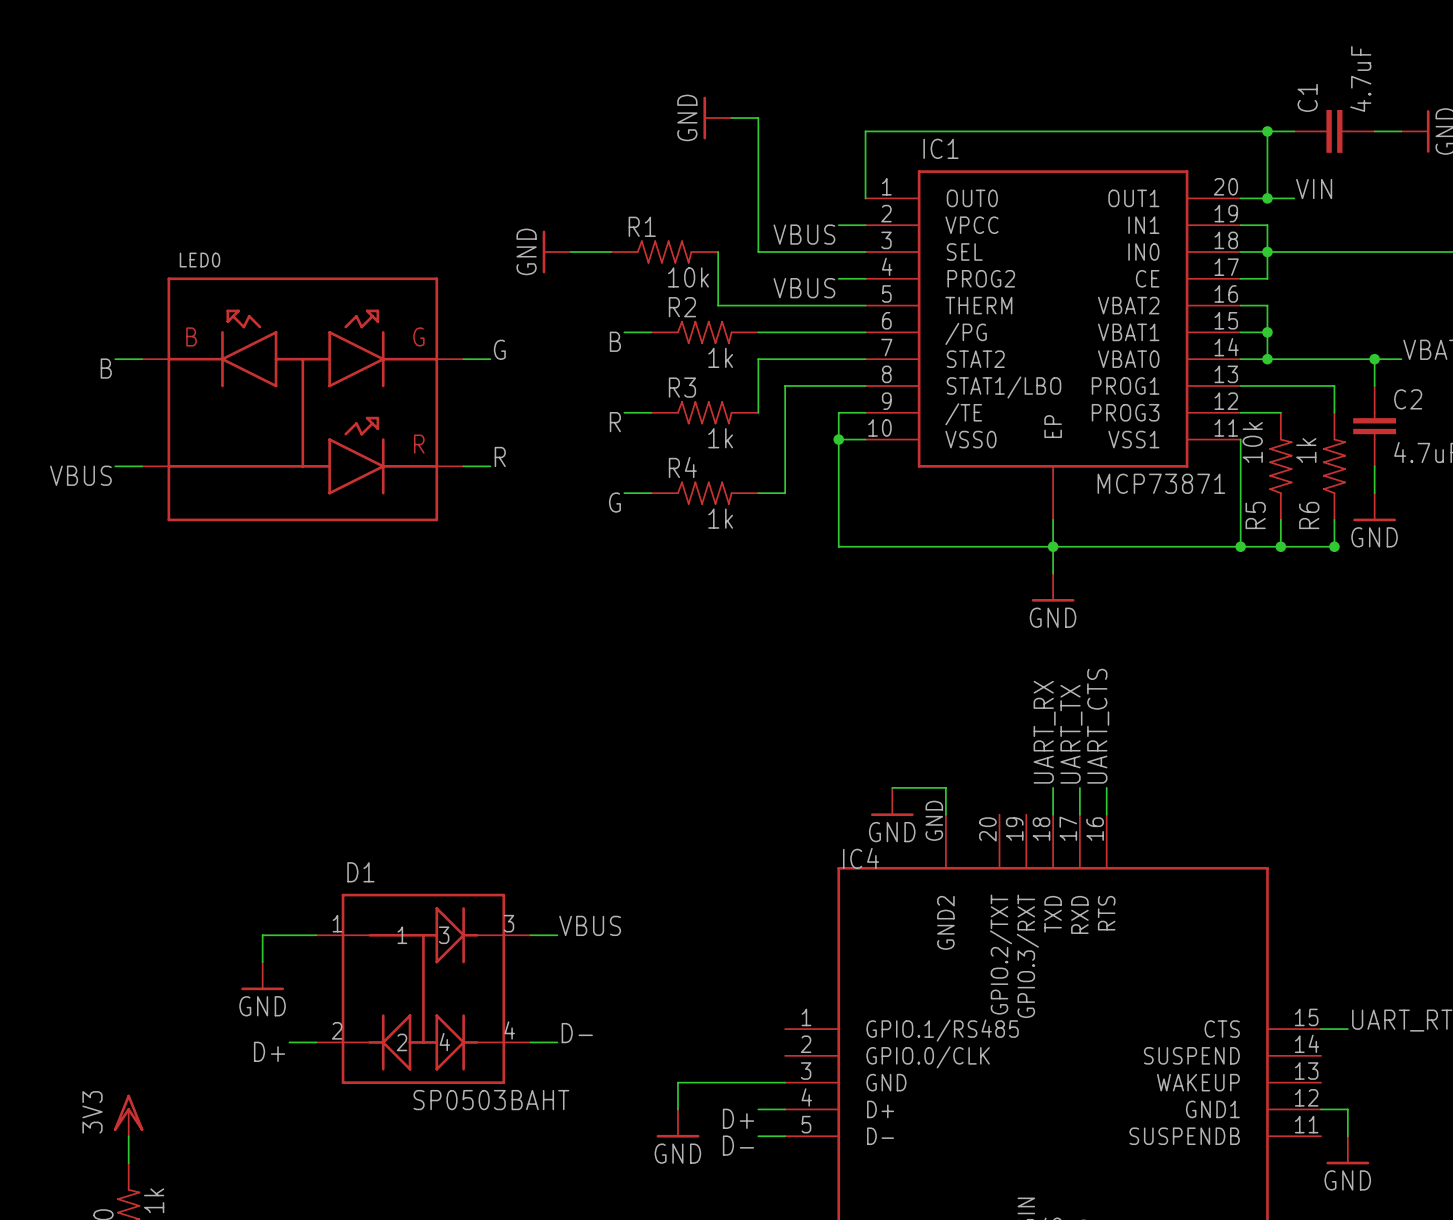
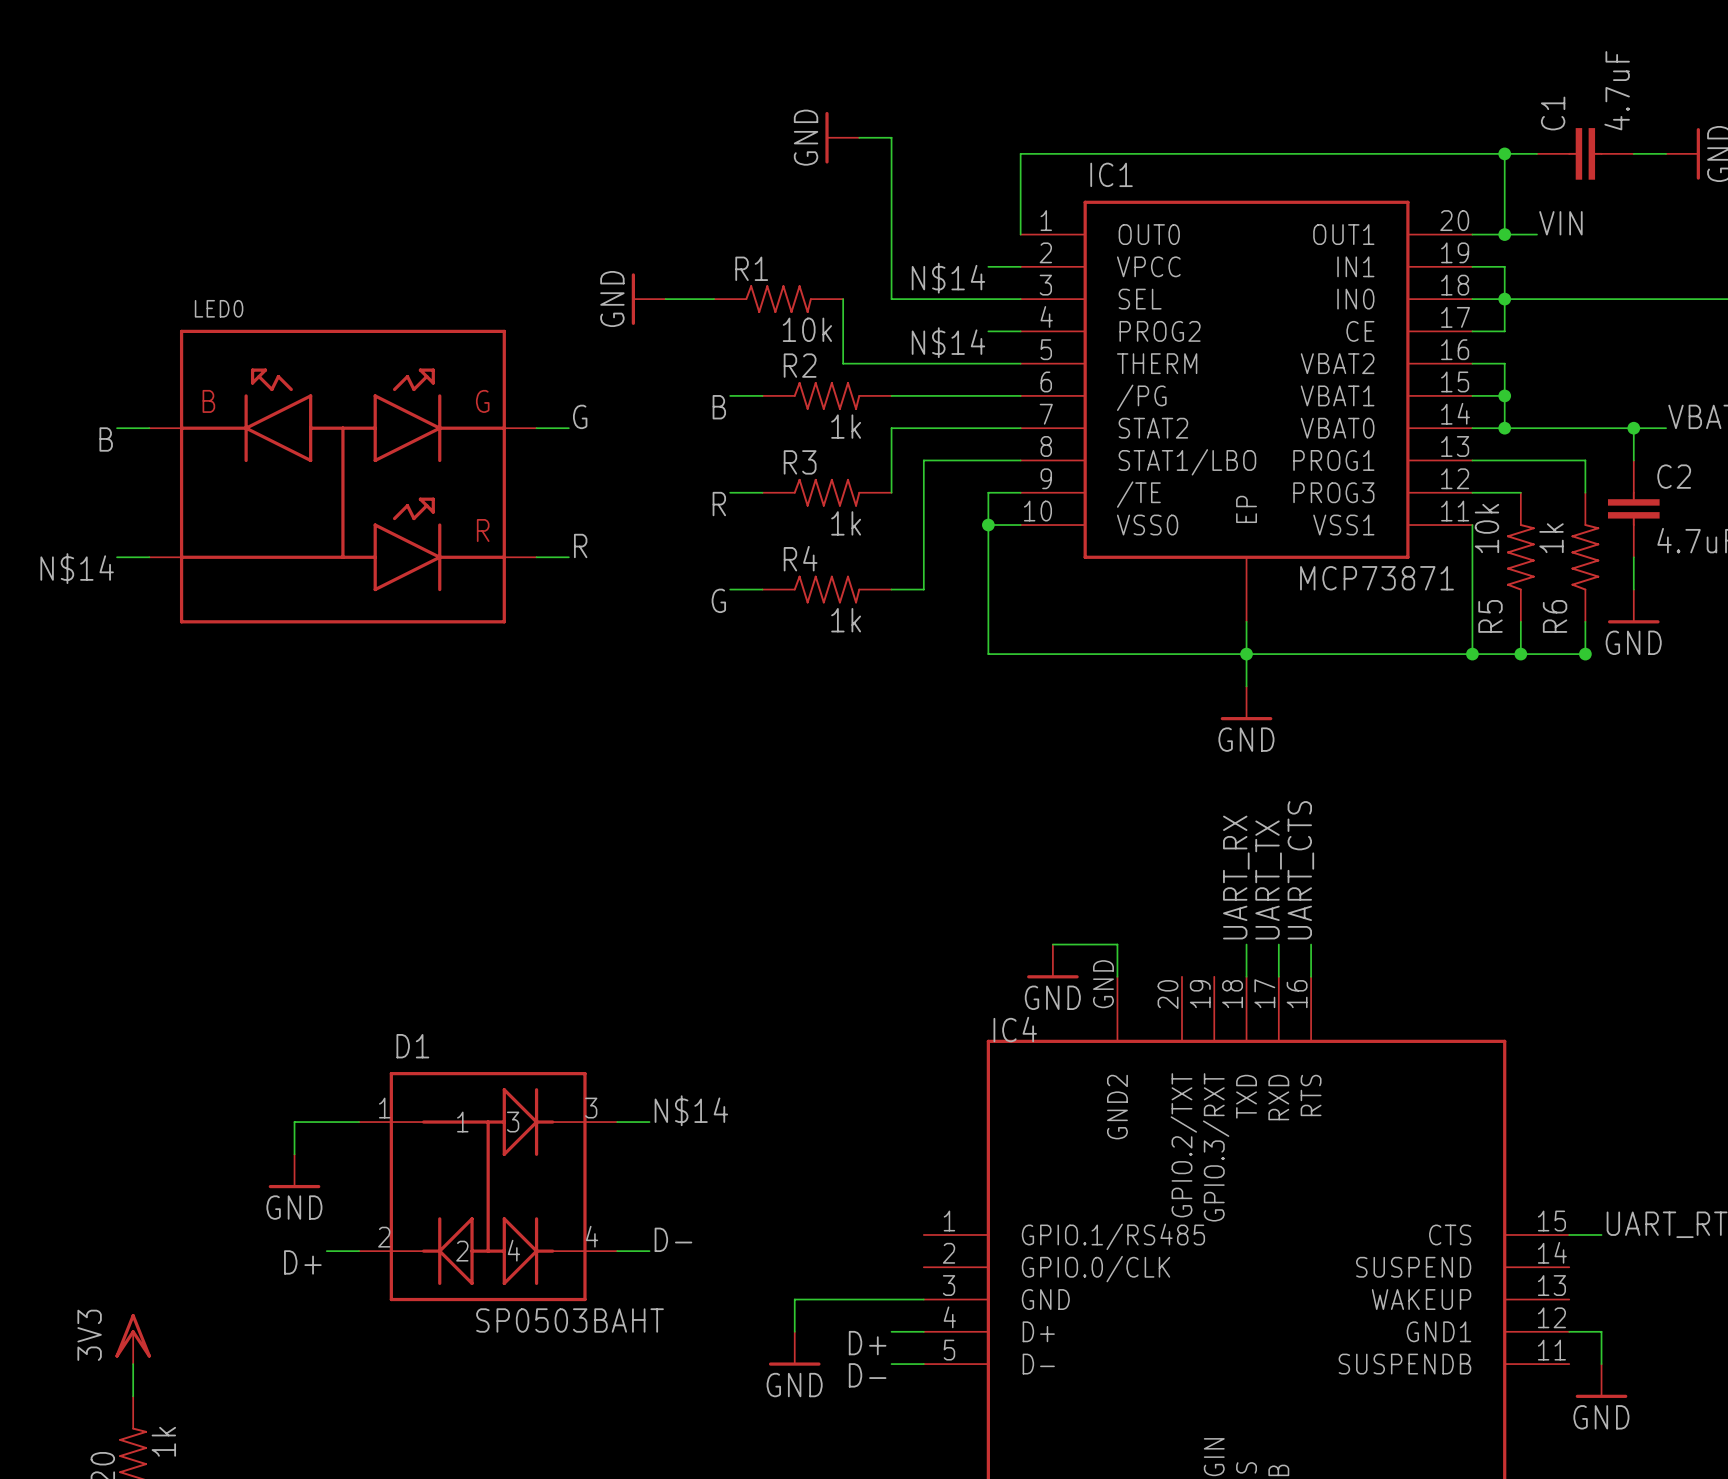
label: VBUS (804, 234) -> N$14 (948, 278)
label: VBUS (804, 288) -> N$14 (948, 342)
label: VBUS (80, 475) -> N$14 (77, 568)
label: VBUS (590, 925) -> N$14 (691, 1110)

